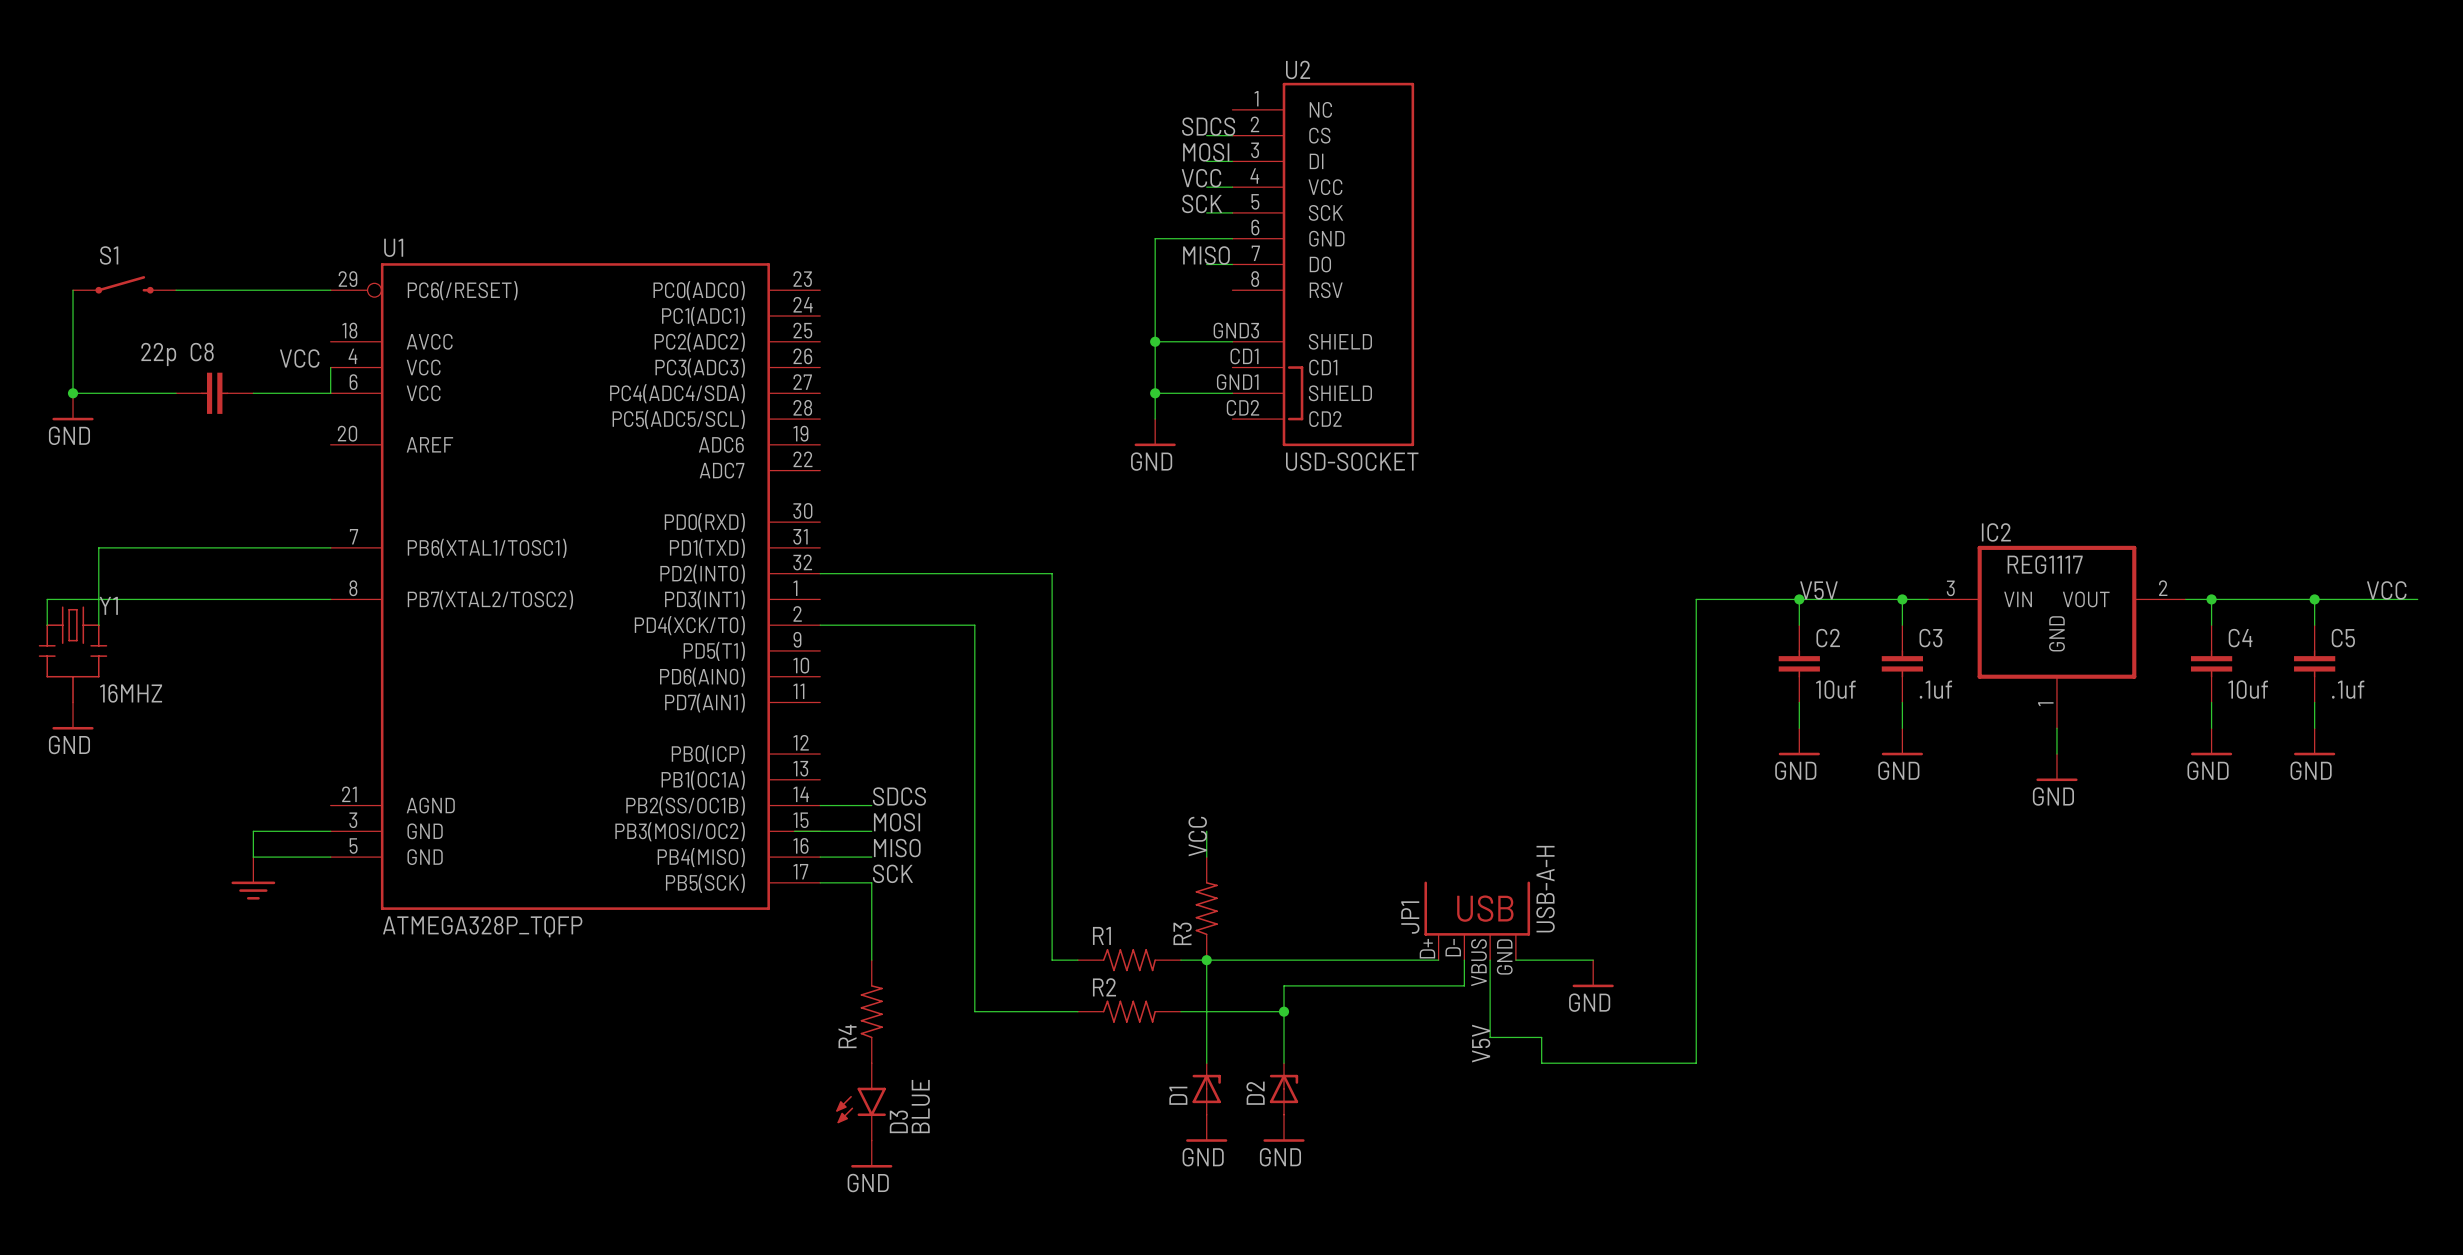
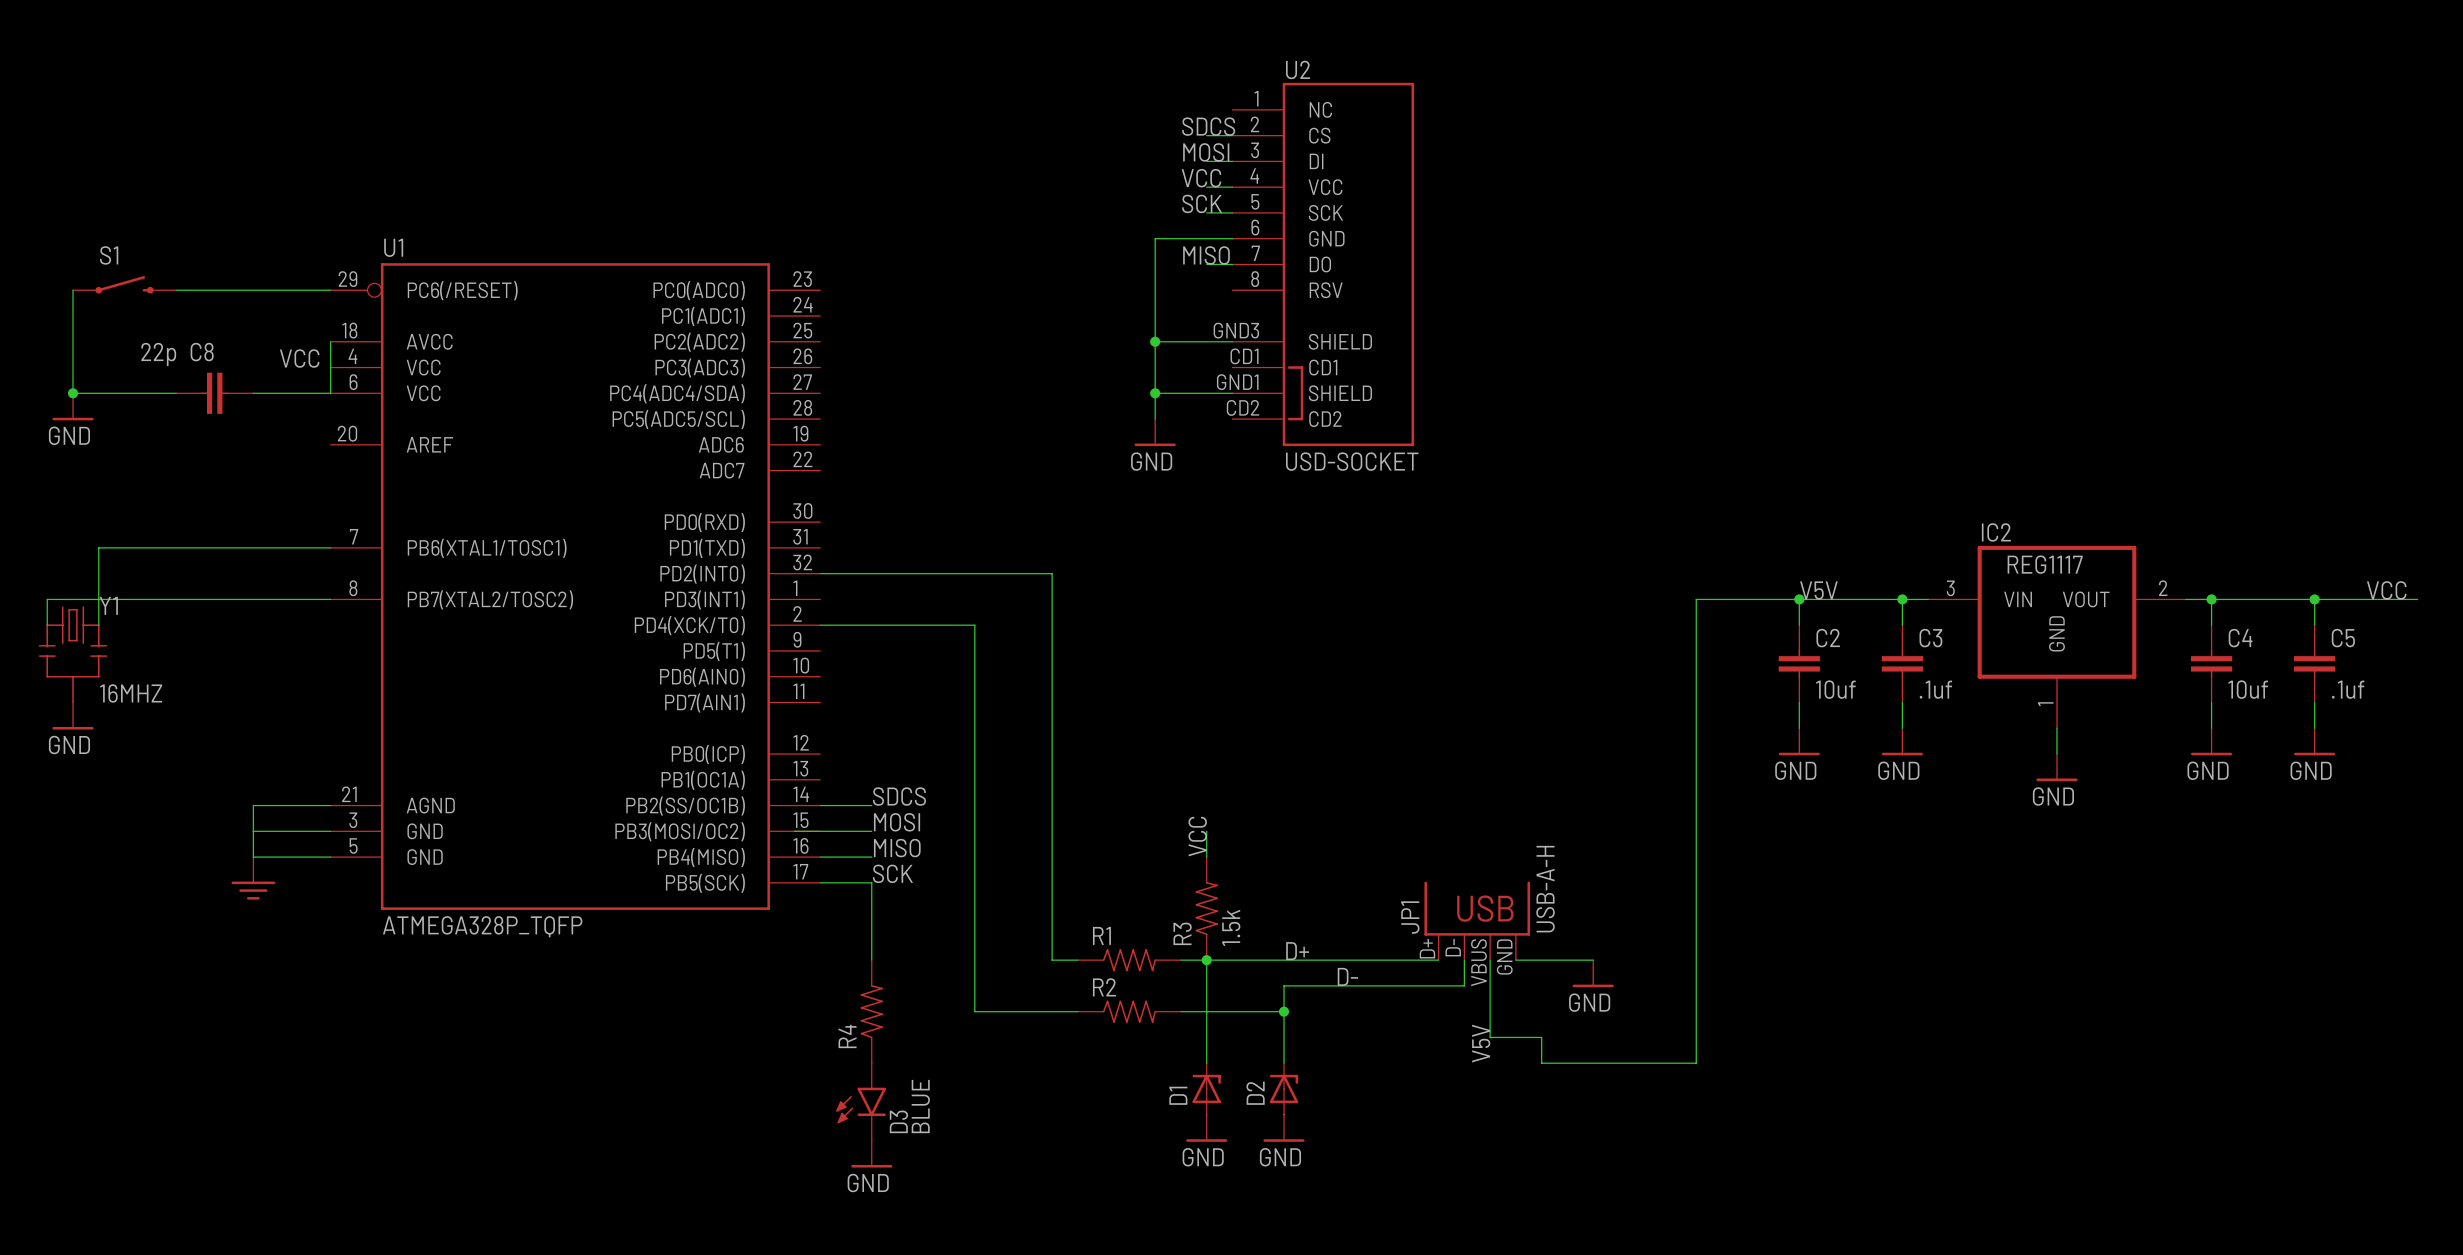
wire: none -> (330, 341) (330, 367)
wire: none -> (330, 805) (253, 805) (253, 831)
R3 value: none -> 1.5k (1231, 927)
label: none -> D+ (1297, 951)
label: none -> D- (1347, 976)

